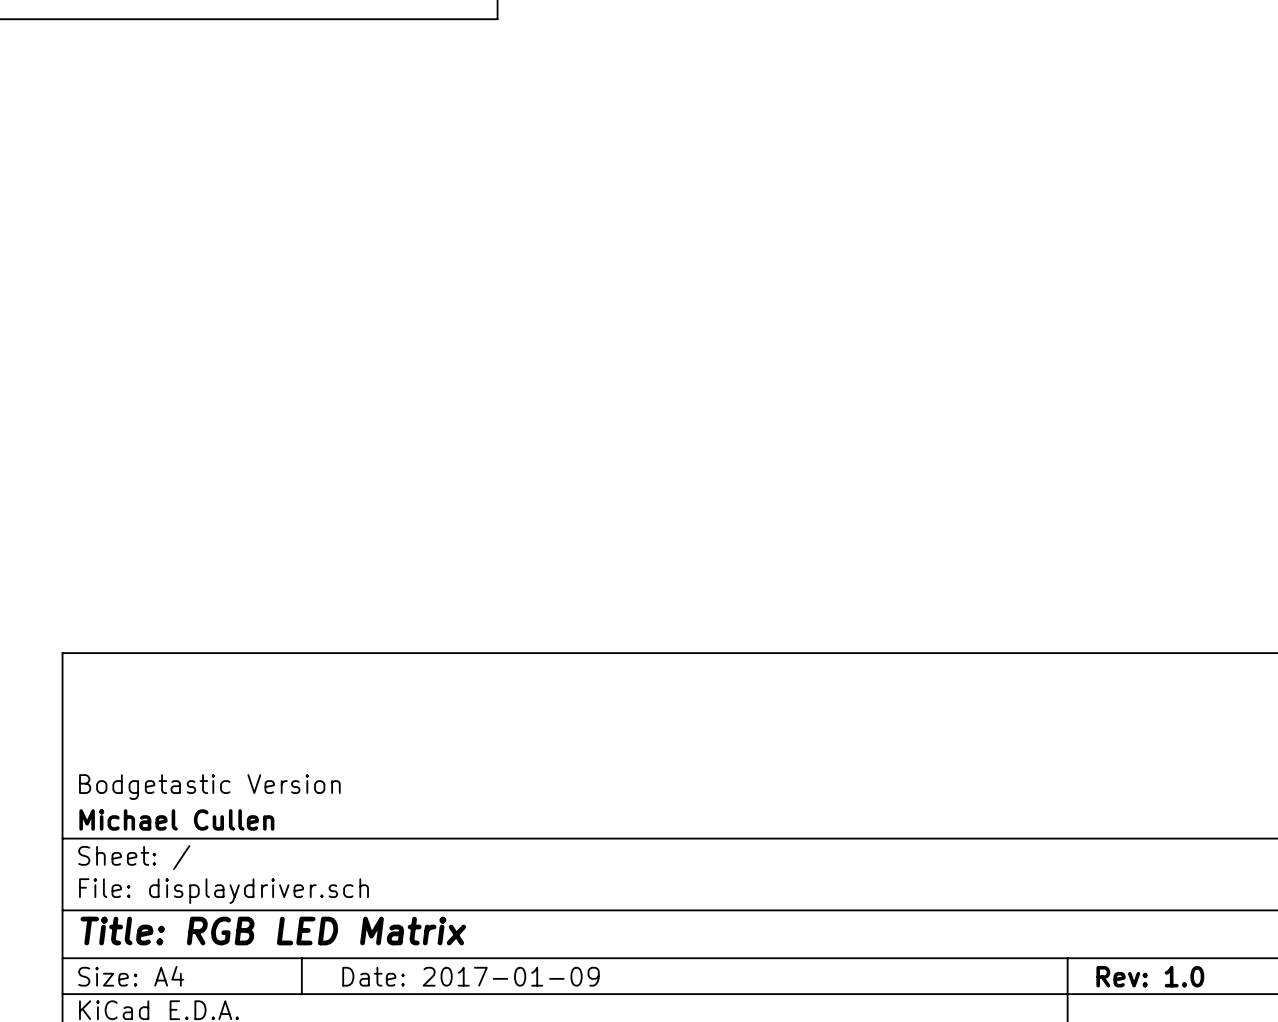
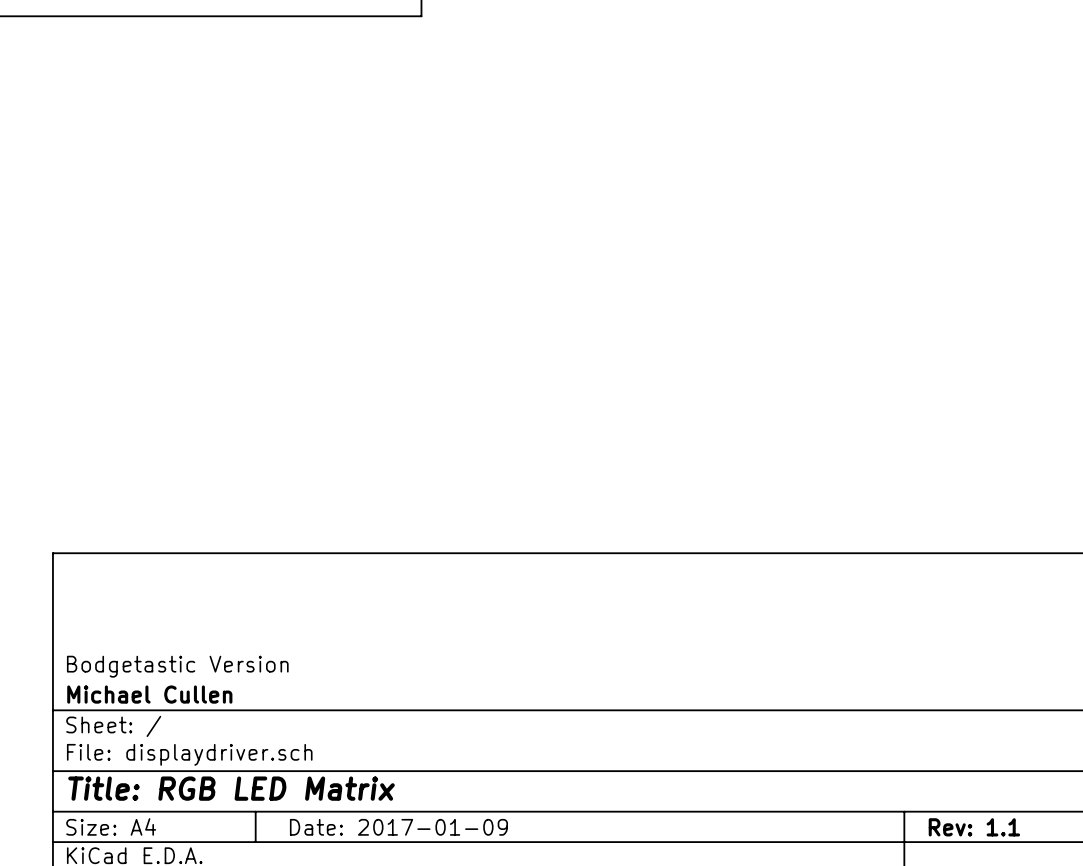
title block: Rev: 1.0 (1150, 976) -> Rev: 1.1 (974, 827)

